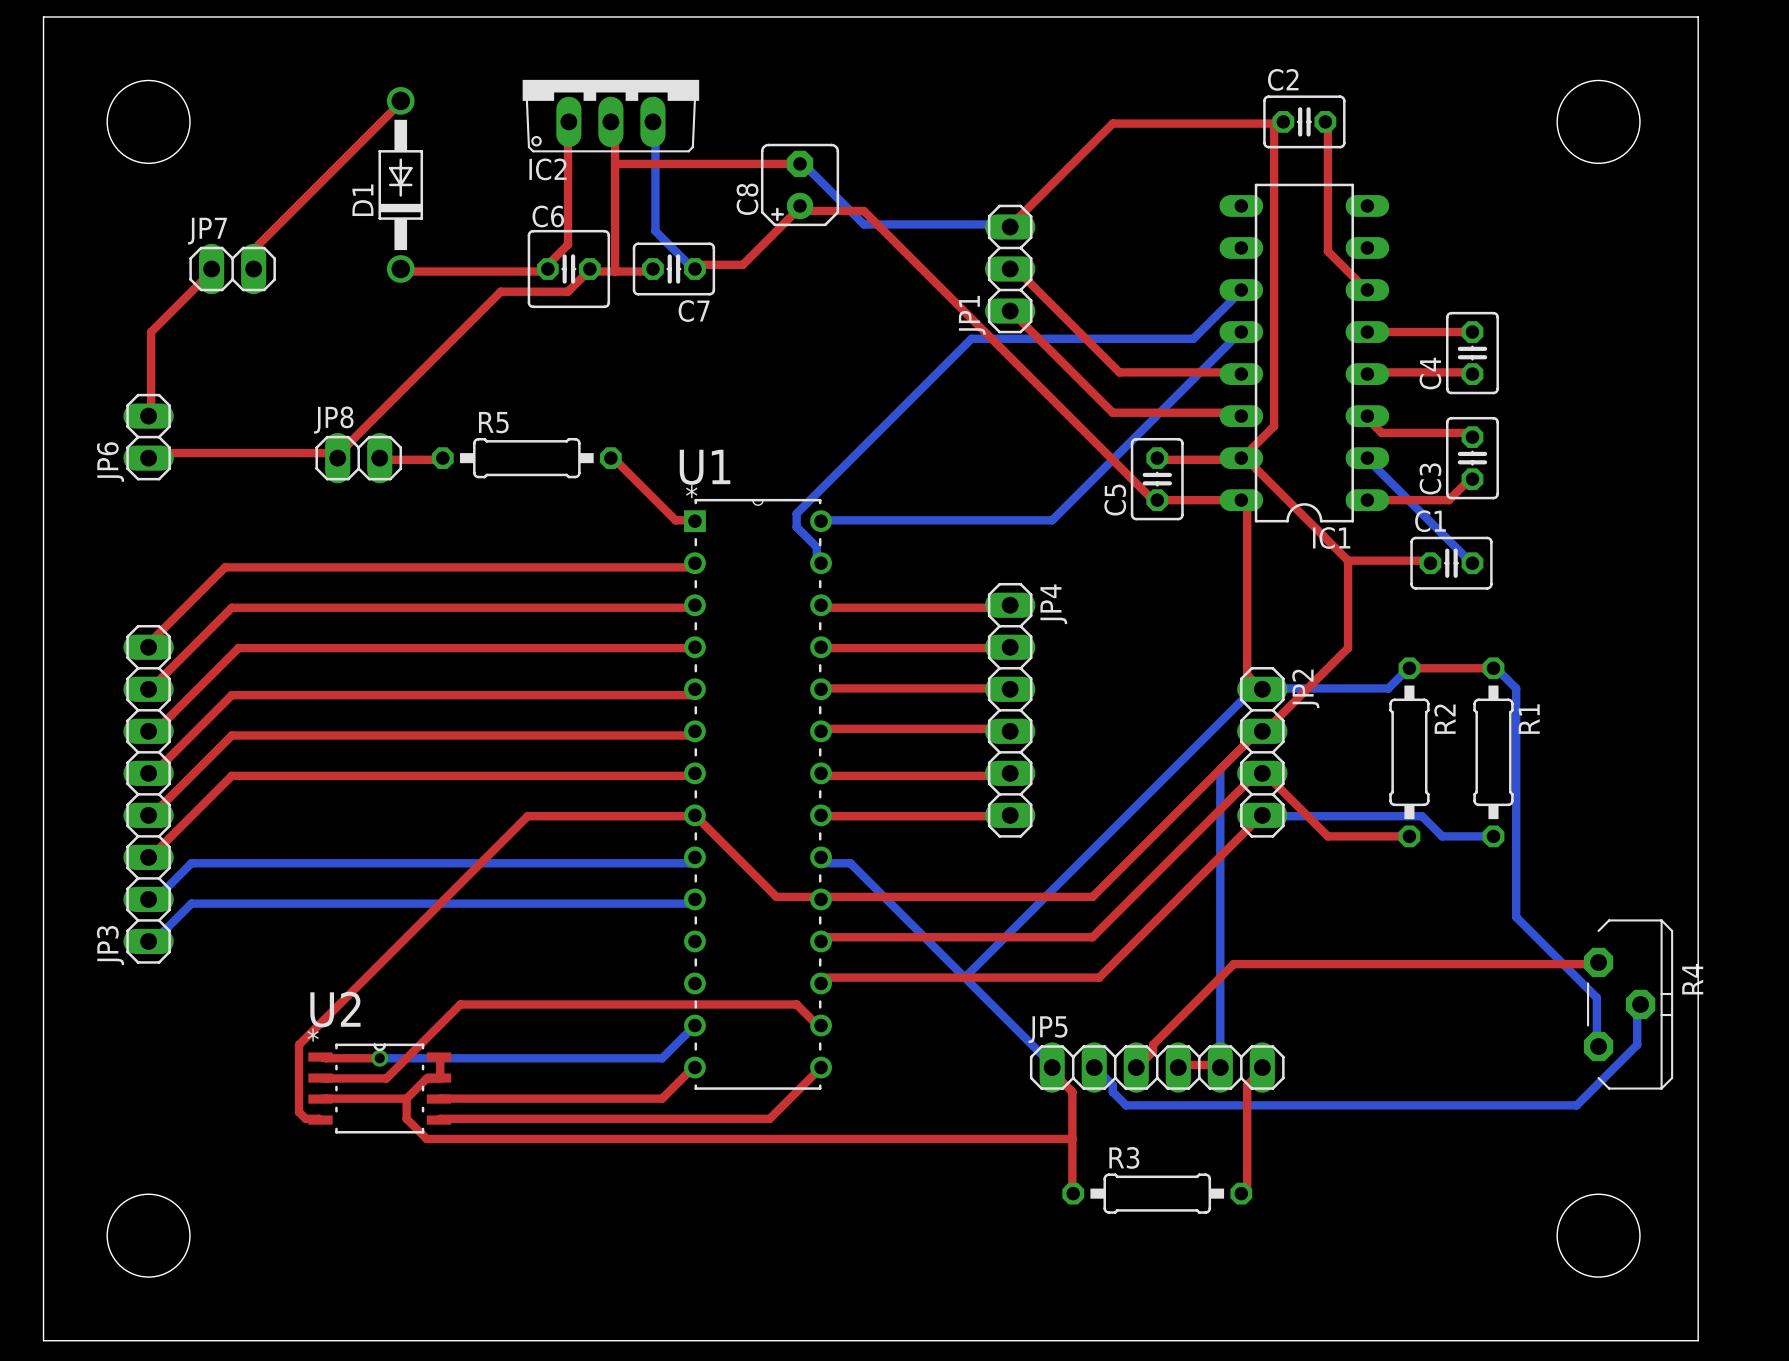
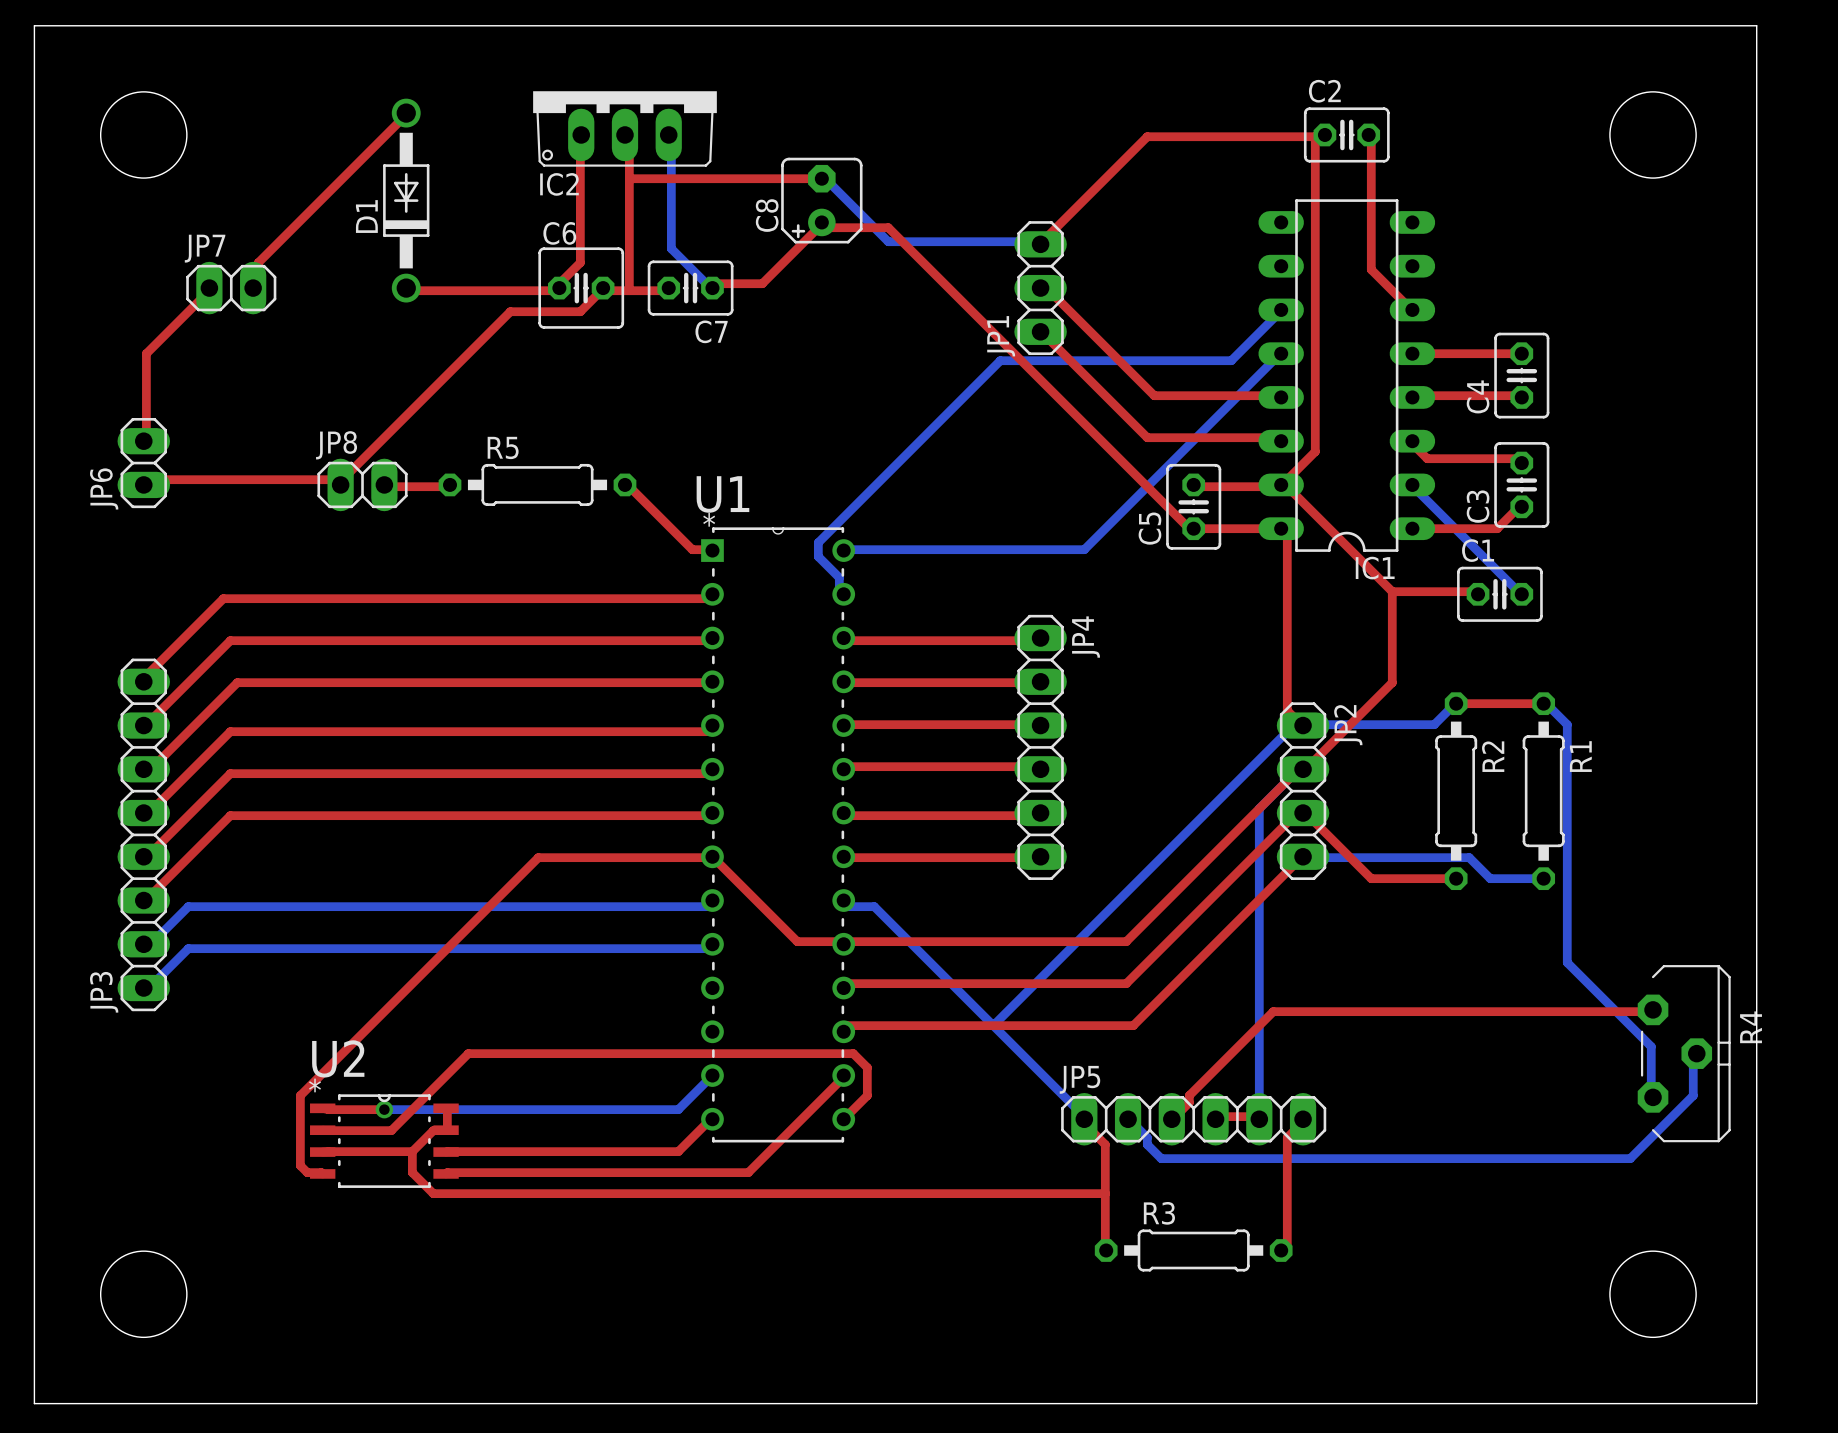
top track: (796, 1004) (816, 1024) (821, 1025) -> (818, 1053) (853, 1053) (867, 1067) (867, 1095) (843, 1119)
top track: (821, 1067) (769, 1118) (729, 1118) -> (843, 1075) (748, 1172)

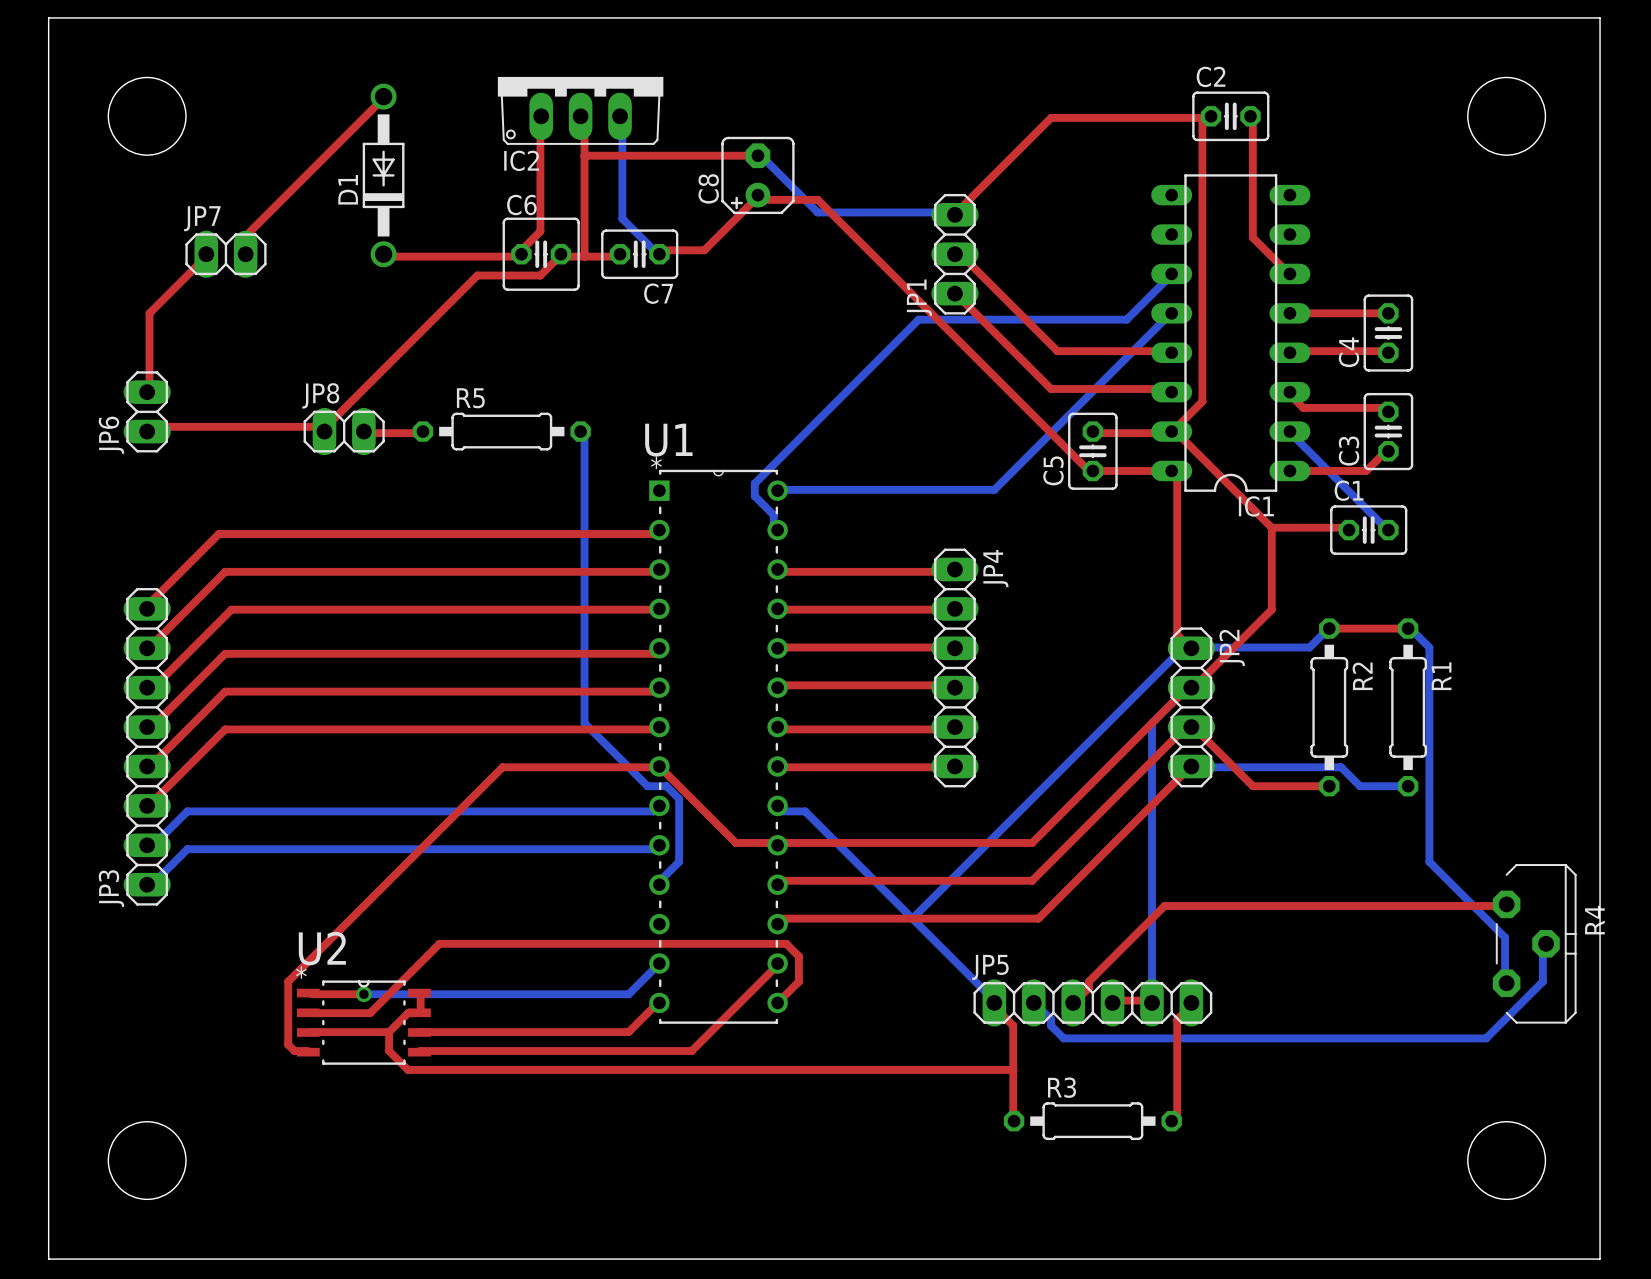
top track: (624, 484) (629, 486) (692, 549) (712, 550) -> none
bottom track: none -> (580, 431) (584, 433) (584, 723) (647, 786) (666, 786) (679, 798) (679, 861) (660, 880) (659, 884)

